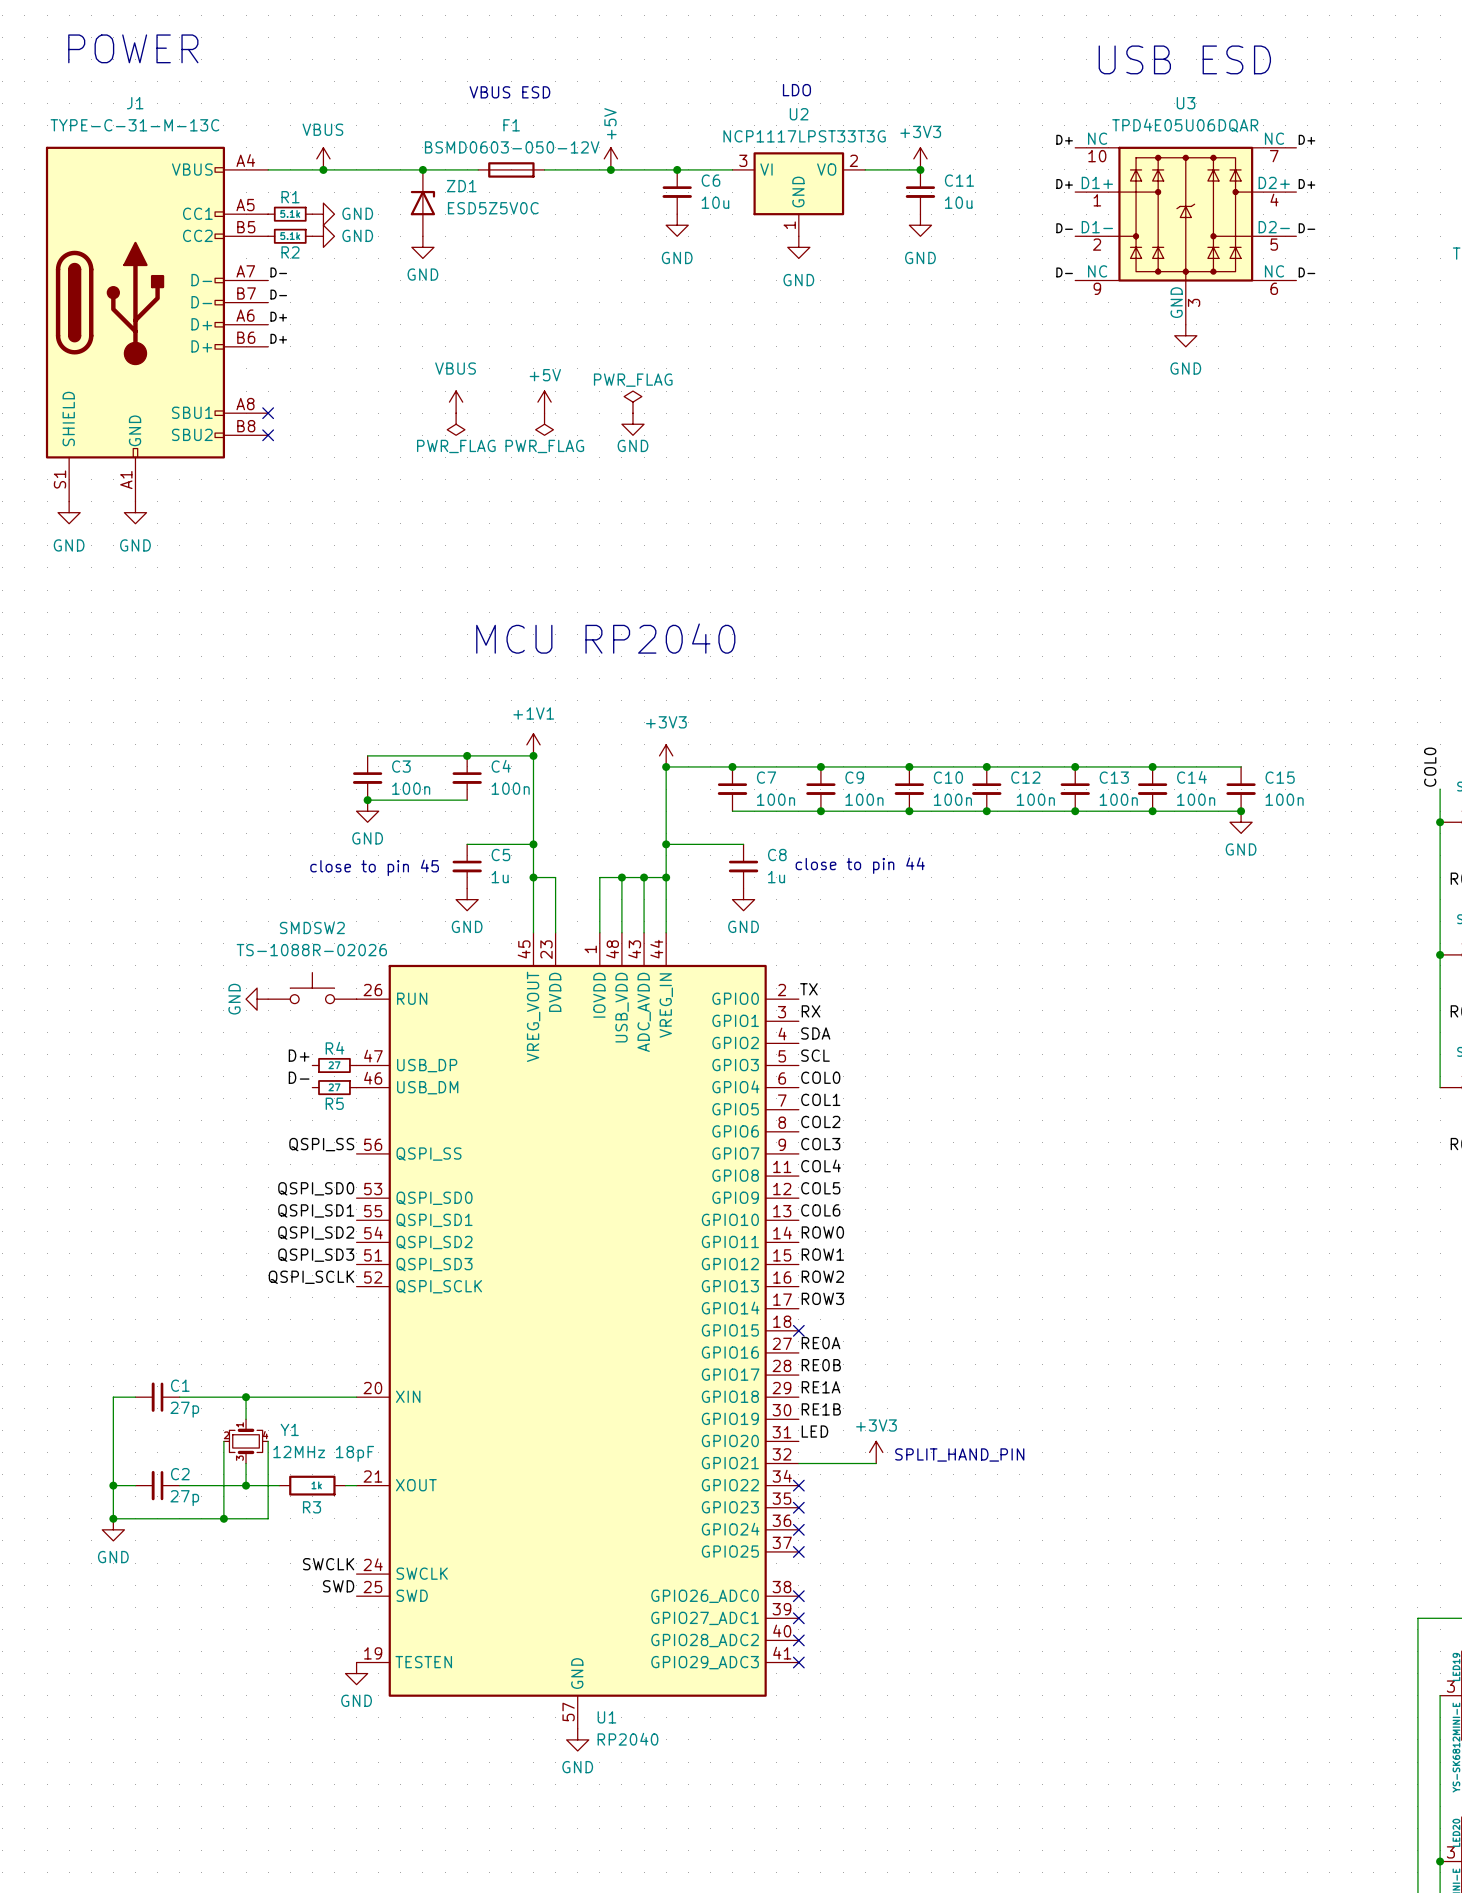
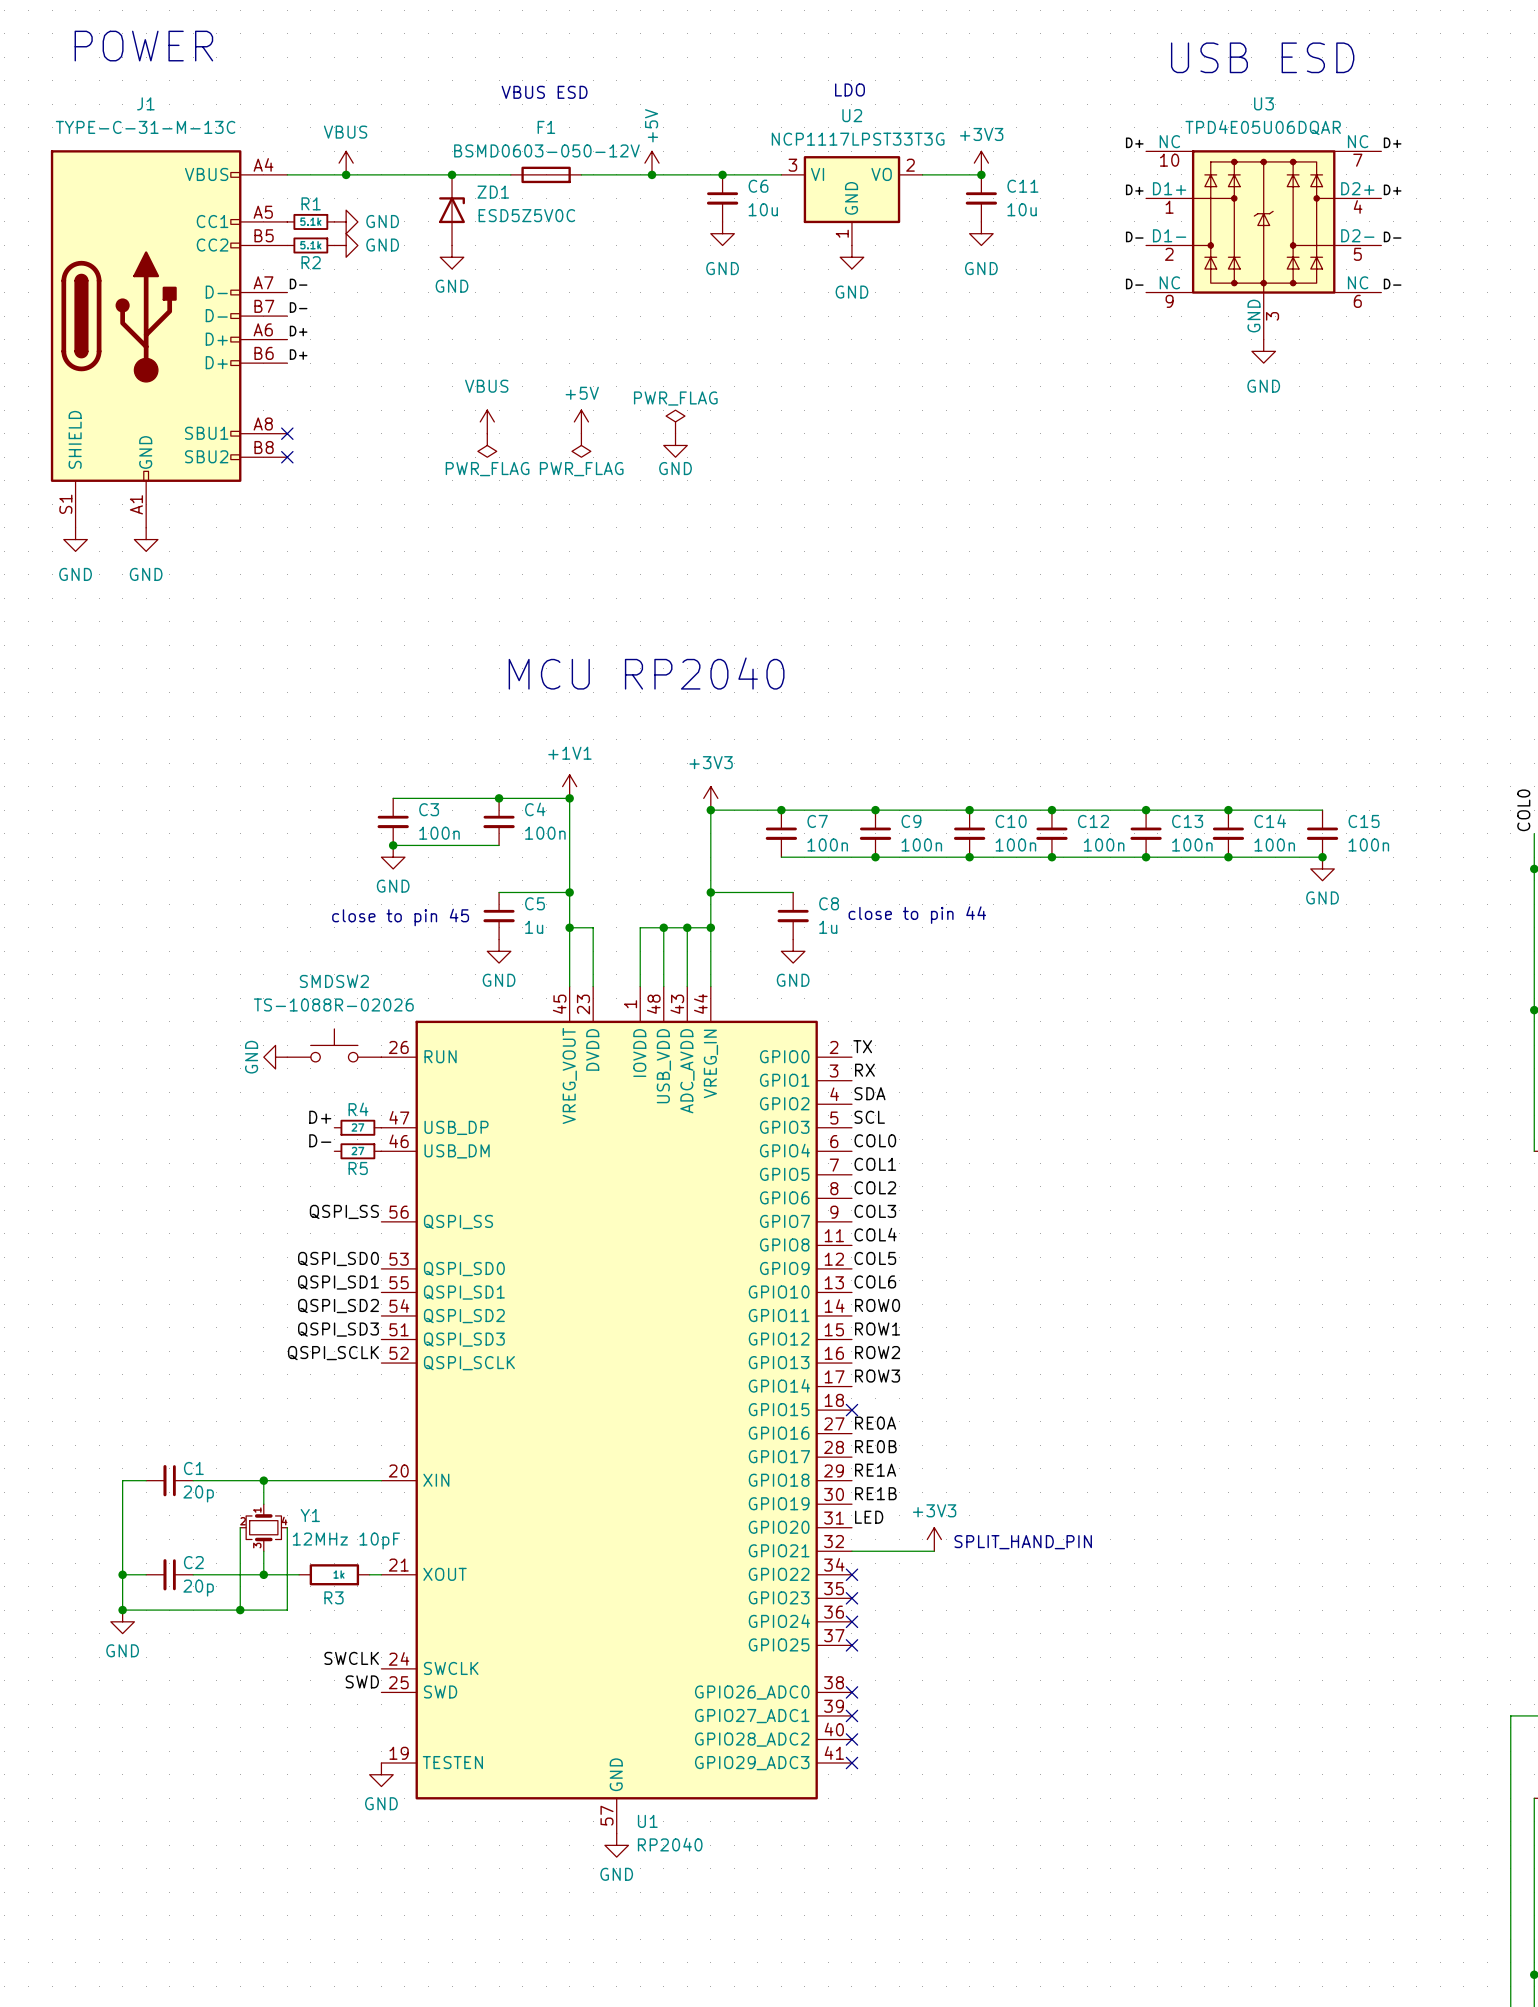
C1 value: 27p (184, 1409) -> 20p (198, 1493)
Y1 value: 12MHz 18pF (323, 1453) -> 12MHz 10pF (346, 1541)
C2 value: 27p (184, 1498) -> 20p (198, 1588)

